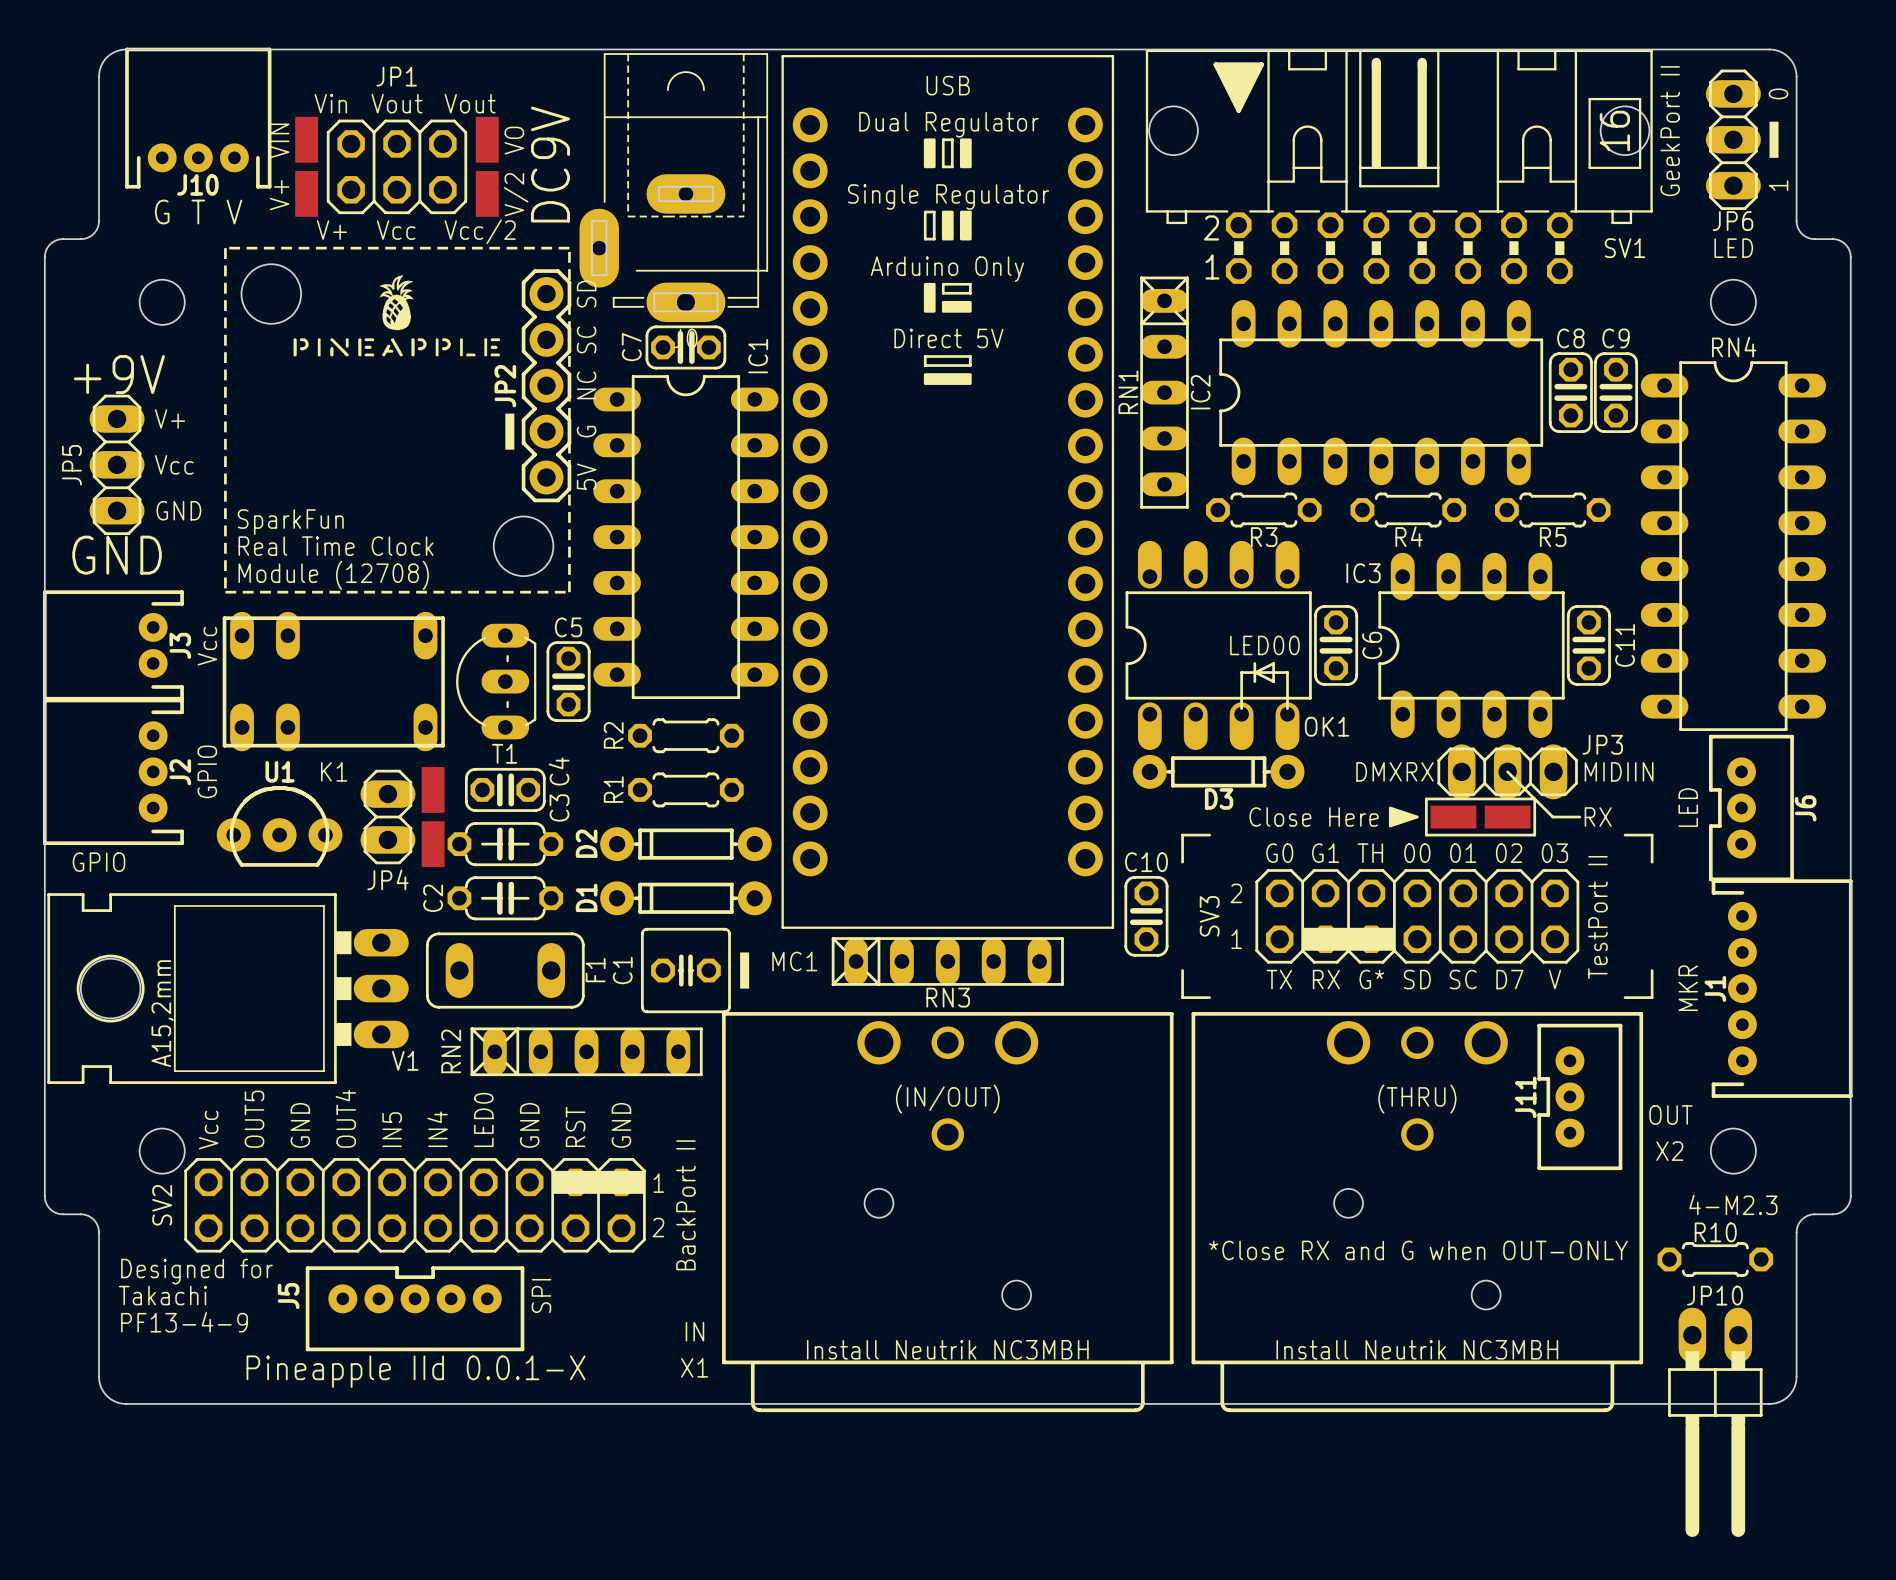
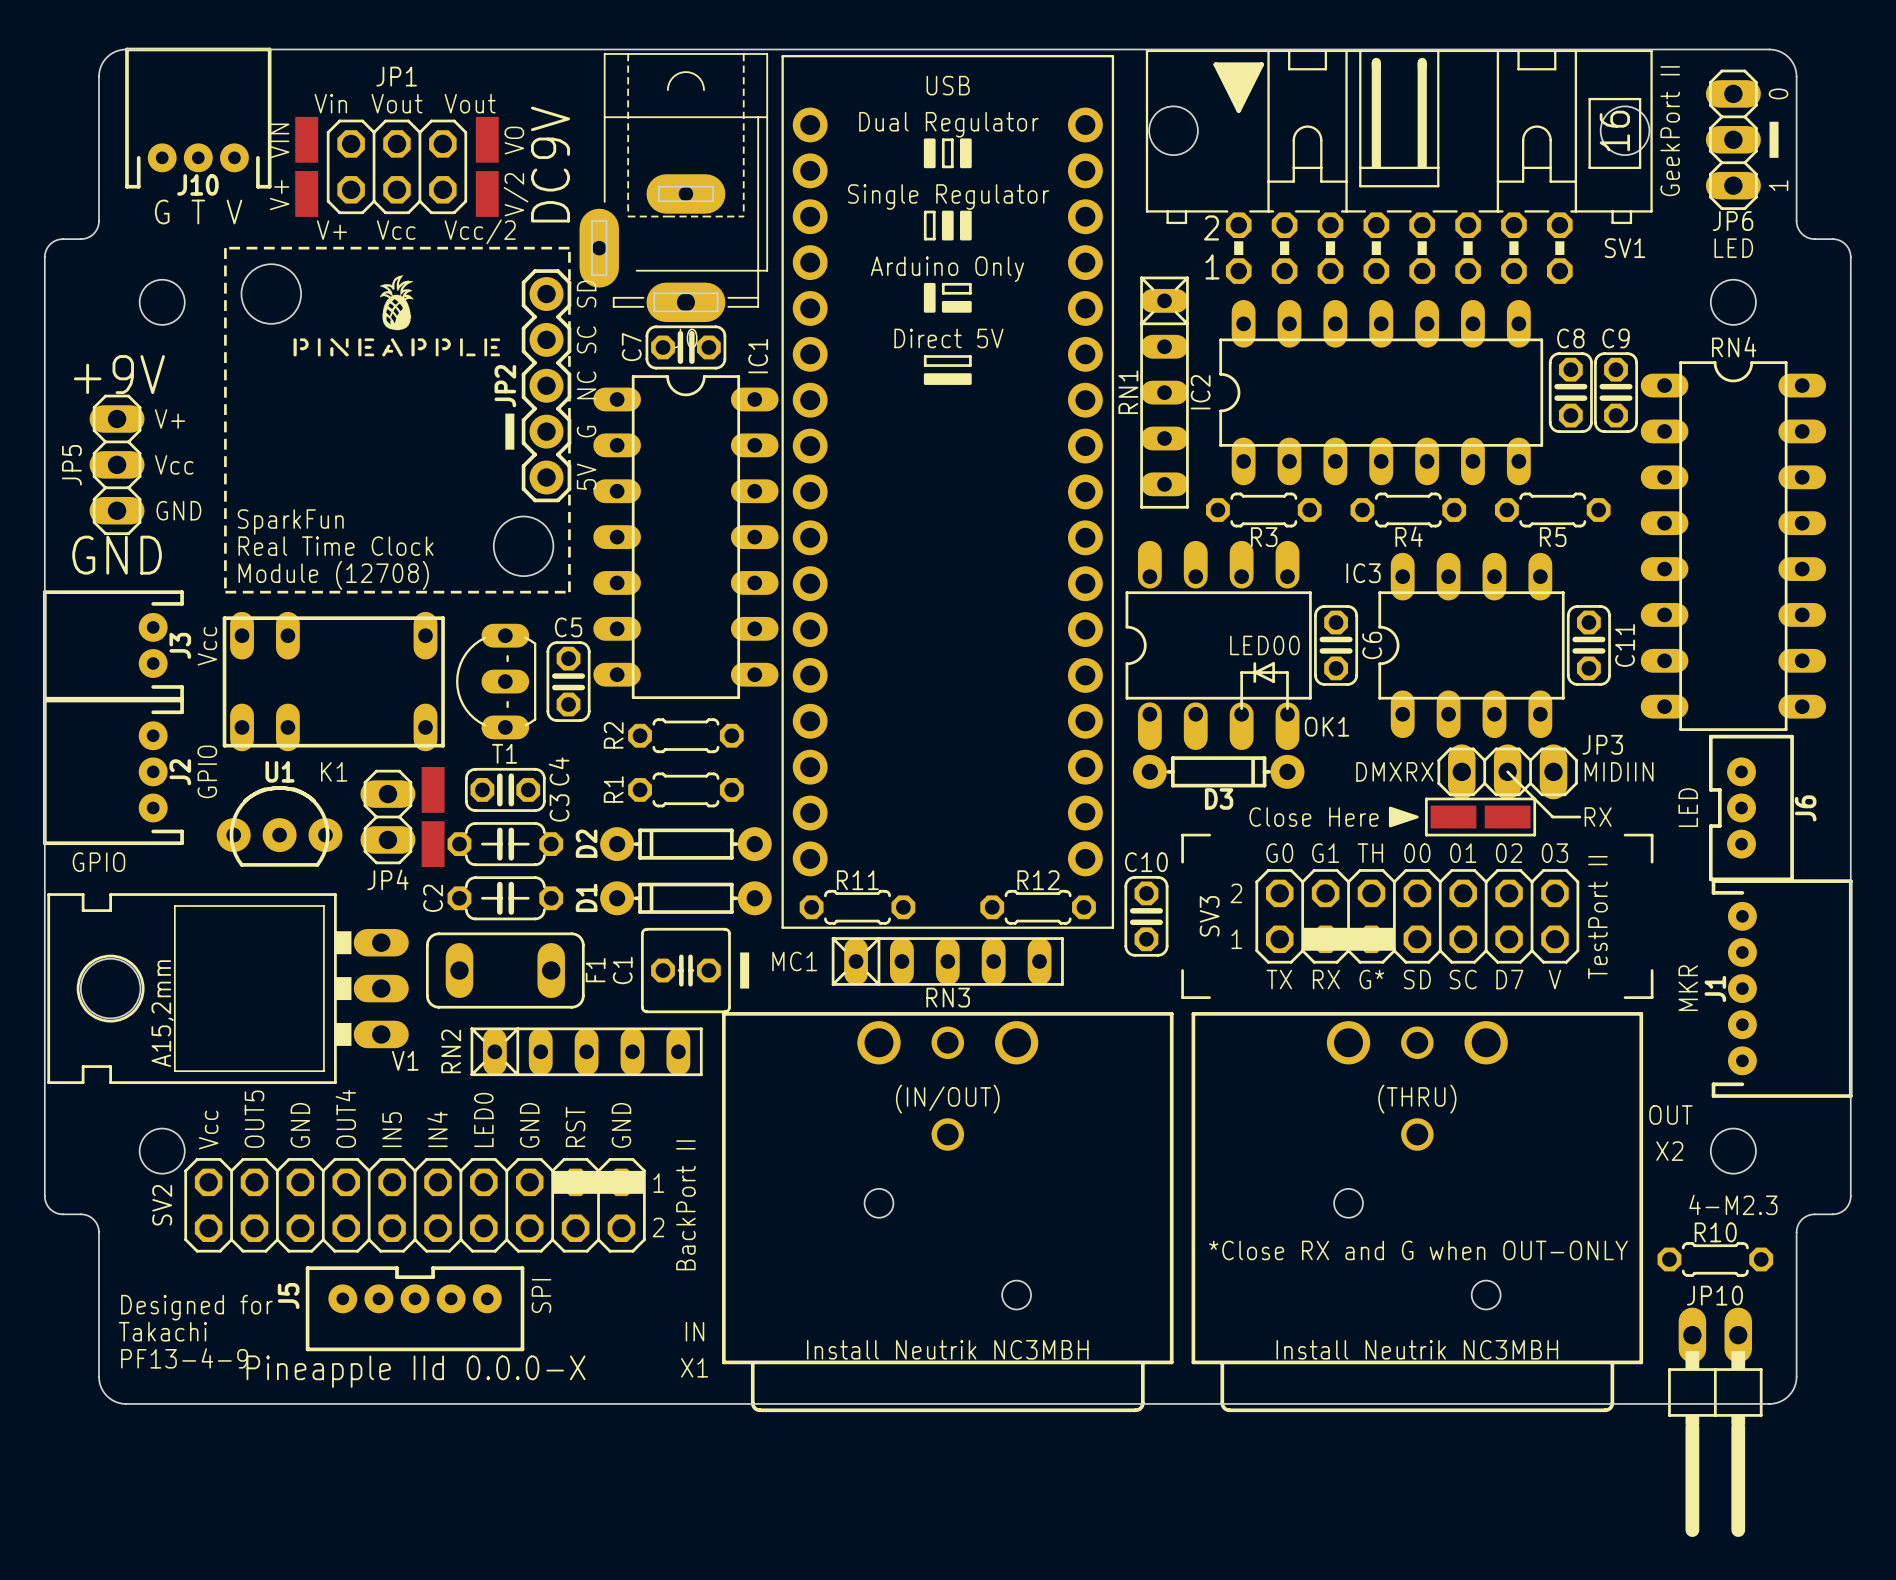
R11: none -> (857, 907)
R12: none -> (1038, 907)
J11: (1579, 1096) -> none
text position: Designed for (196, 1271) -> Designed for (196, 1307)
text position: Takachi (162, 1295) -> Takachi (162, 1331)
text position: PF13-4-9 (184, 1322) -> PF13-4-9 (184, 1358)
text: Pineapple IId 0.0.1-X (416, 1371) -> Pineapple IId 0.0.0-X (416, 1371)

